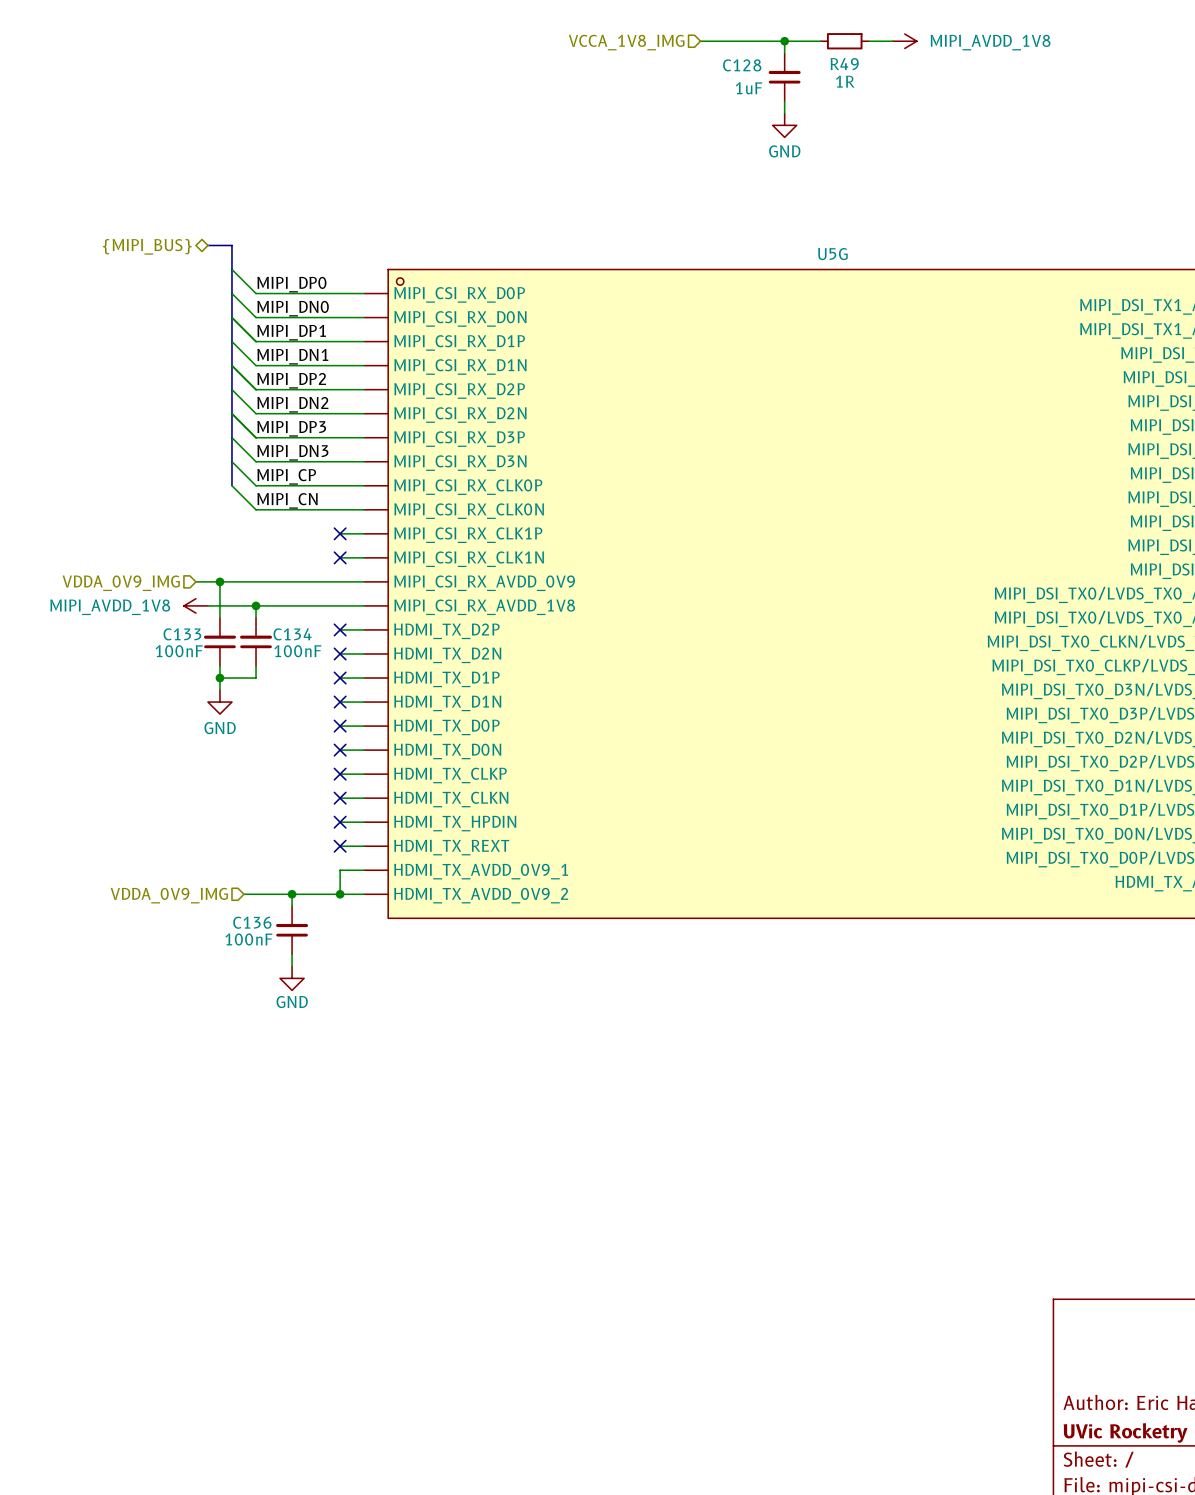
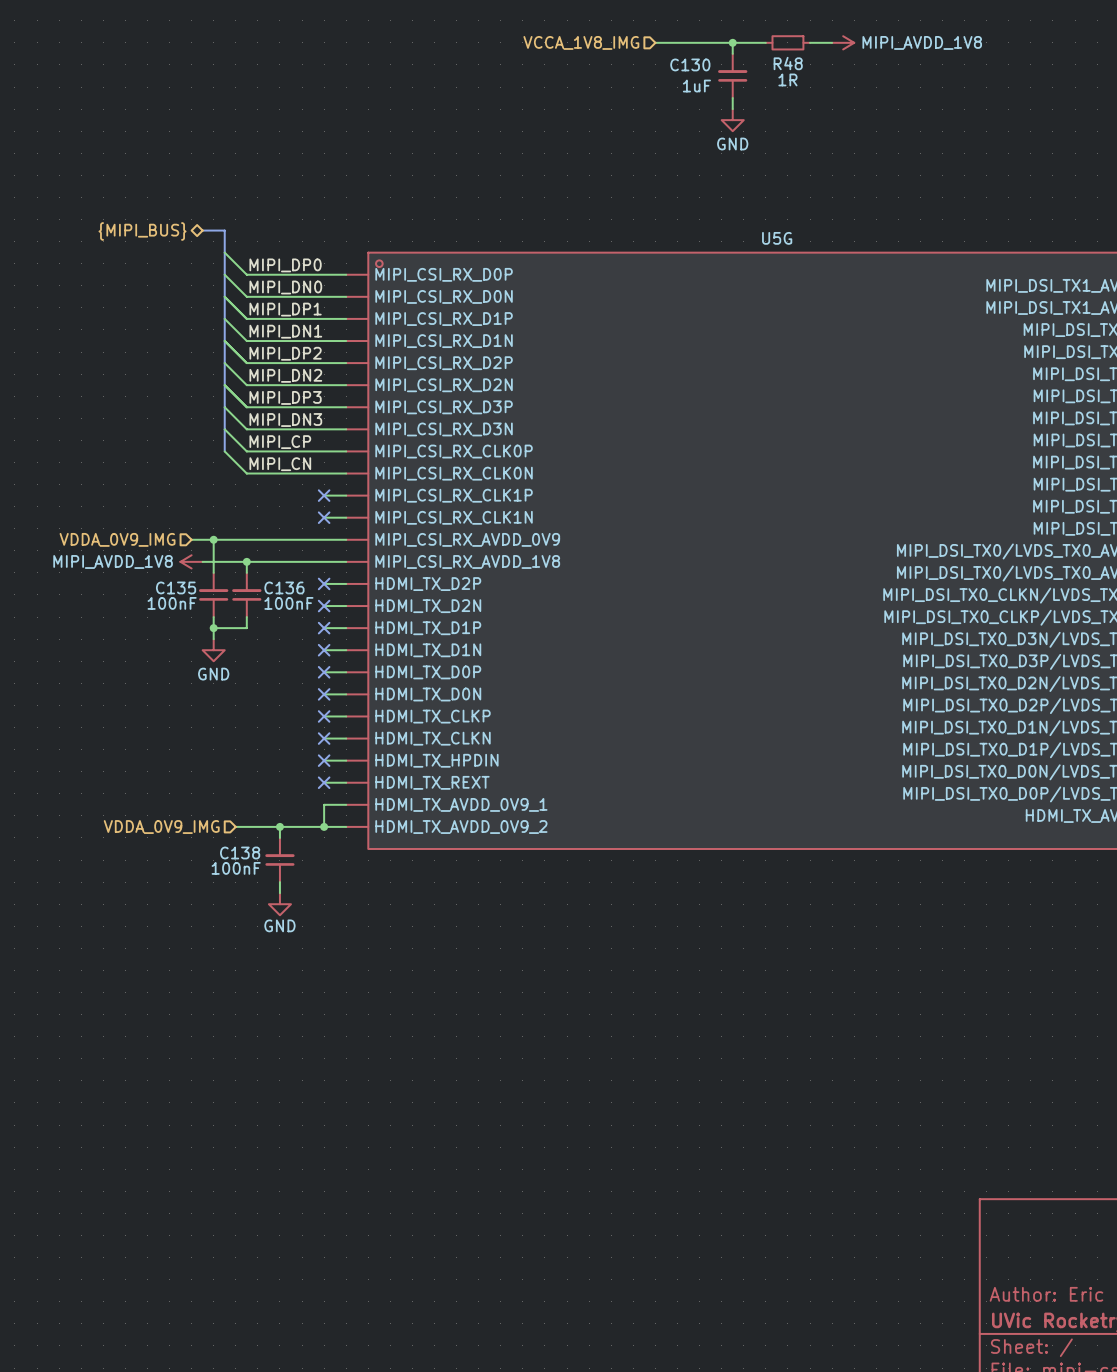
R49 name: R49 (844, 64) -> R48 (788, 63)
C128 name: C128 (742, 65) -> C130 (690, 64)
C133 name: C133 (182, 634) -> C135 (176, 587)
C134 name: C134 (292, 634) -> C136 (284, 587)
C136 name: C136 (252, 922) -> C138 (240, 852)

